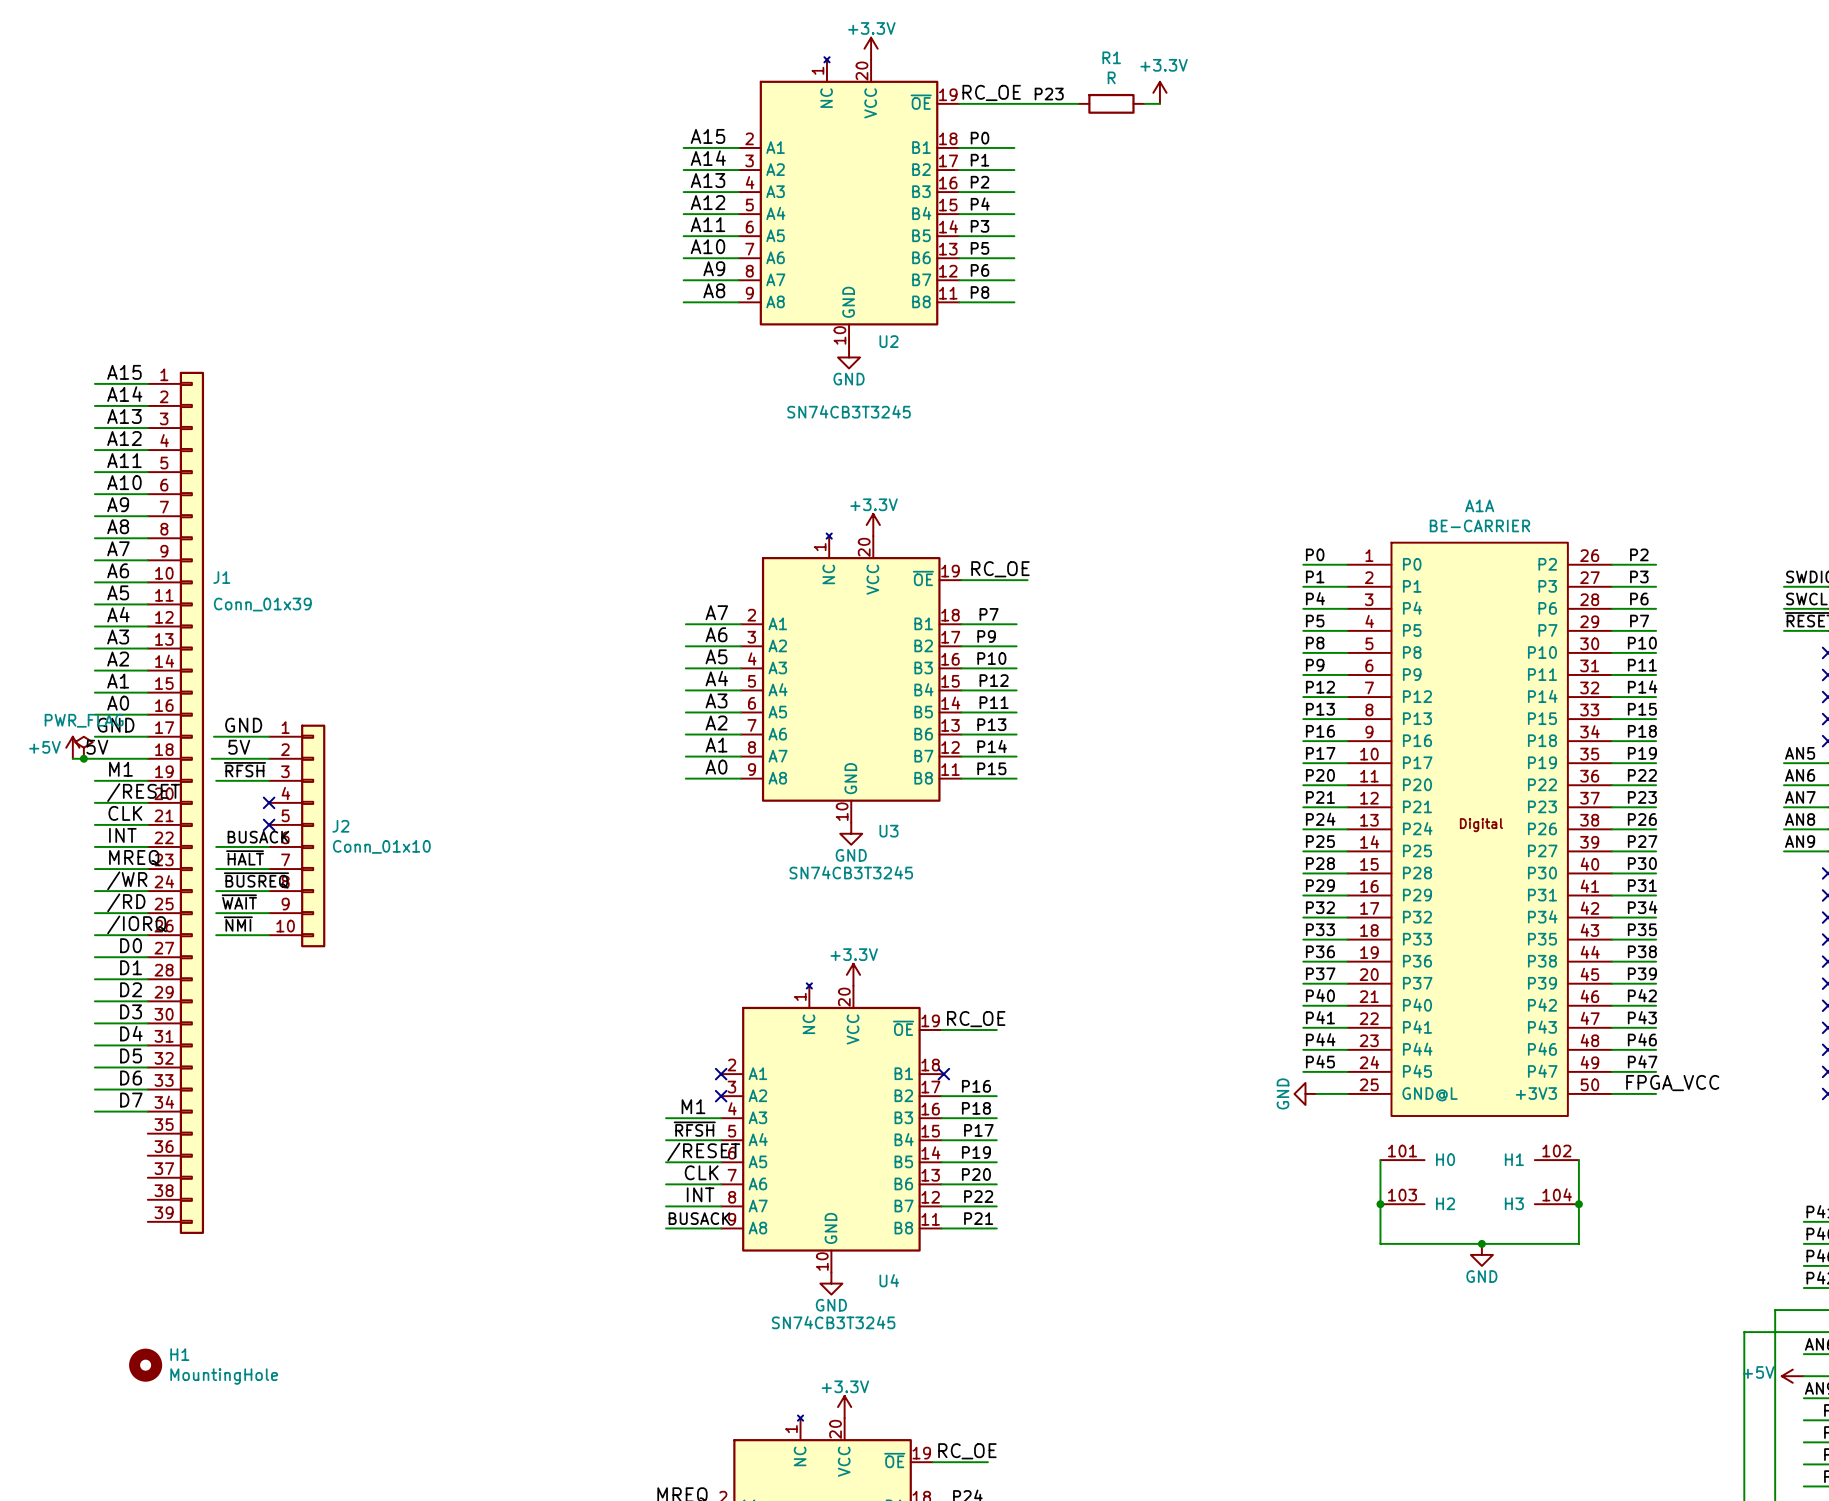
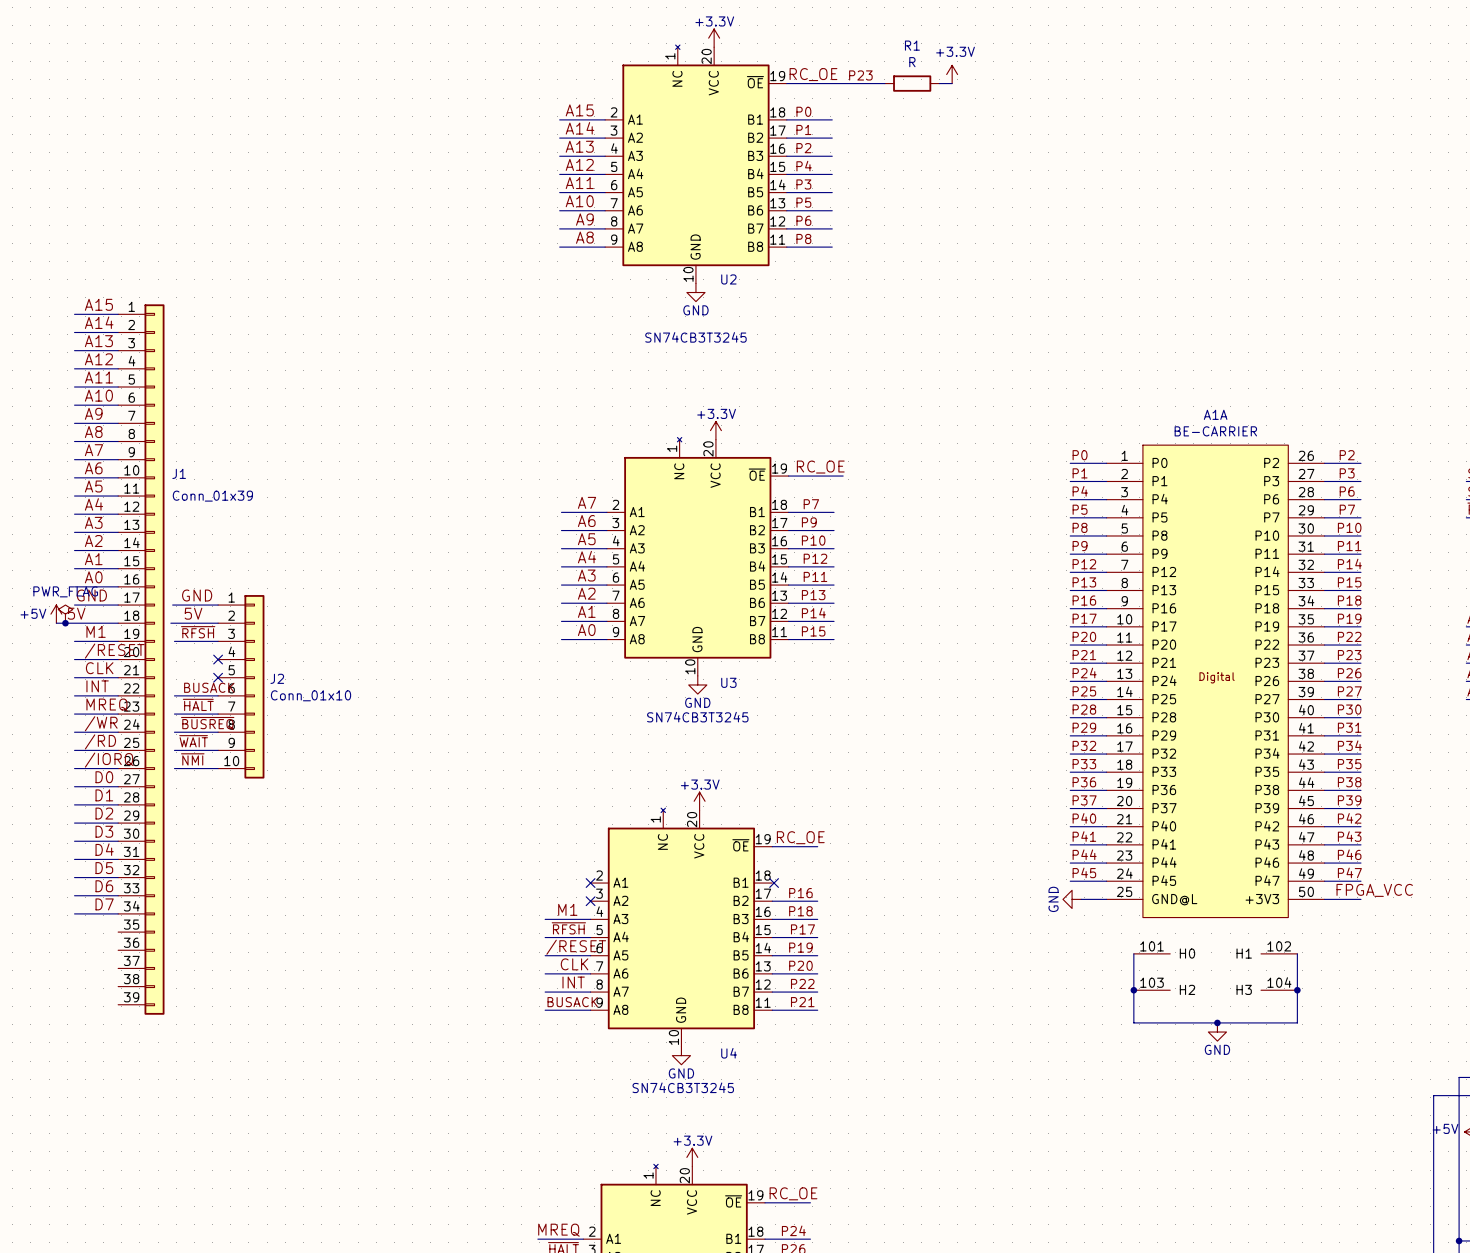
H1: MountingHole (145, 1365) -> none

